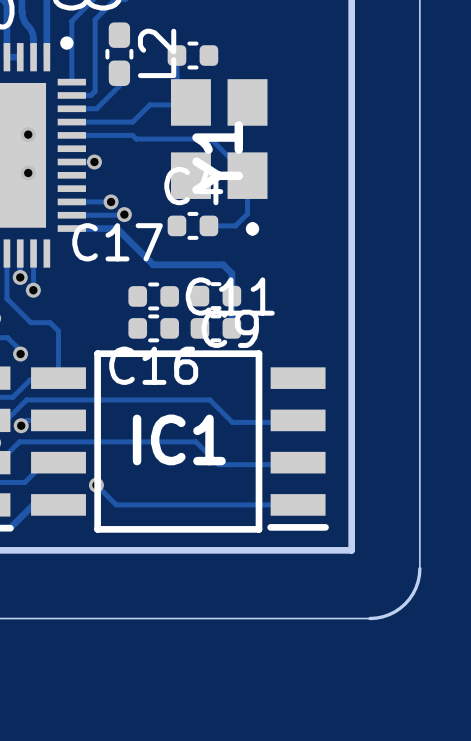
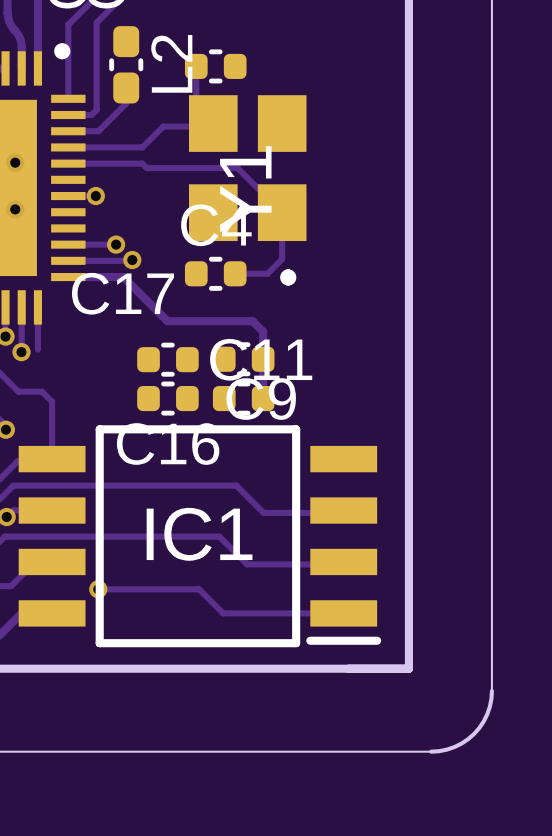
track: none -> (37, 307) (37, 349)
track: (96, 485) (116, 504) (199, 504) -> (98, 589) (199, 589) (223, 613)

